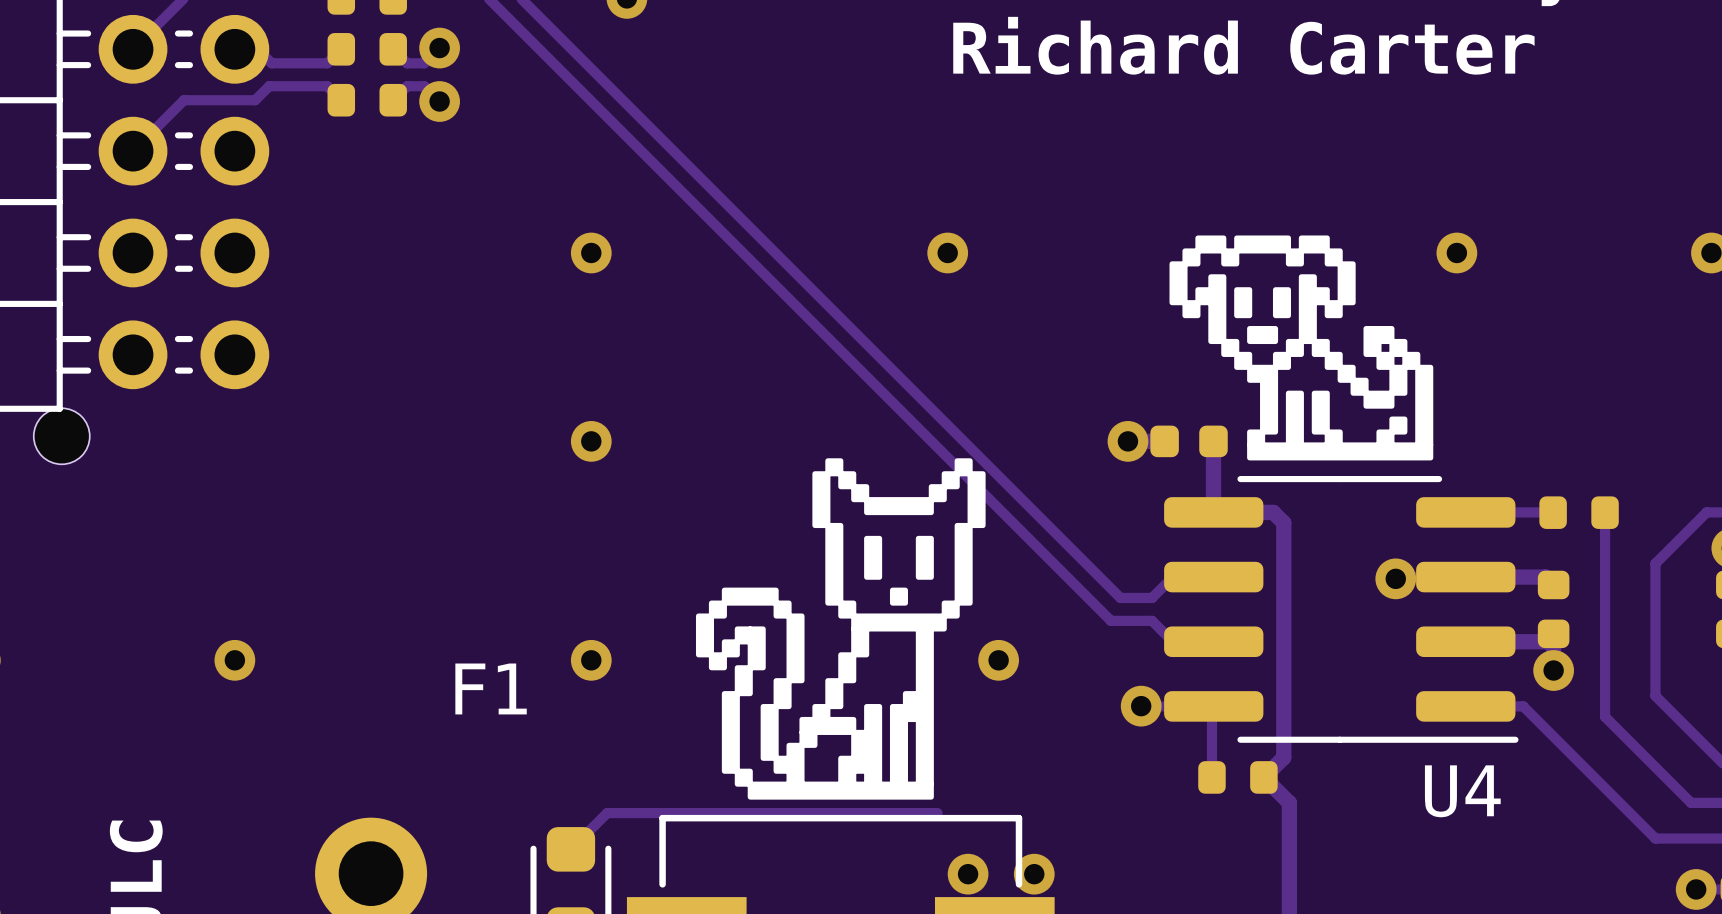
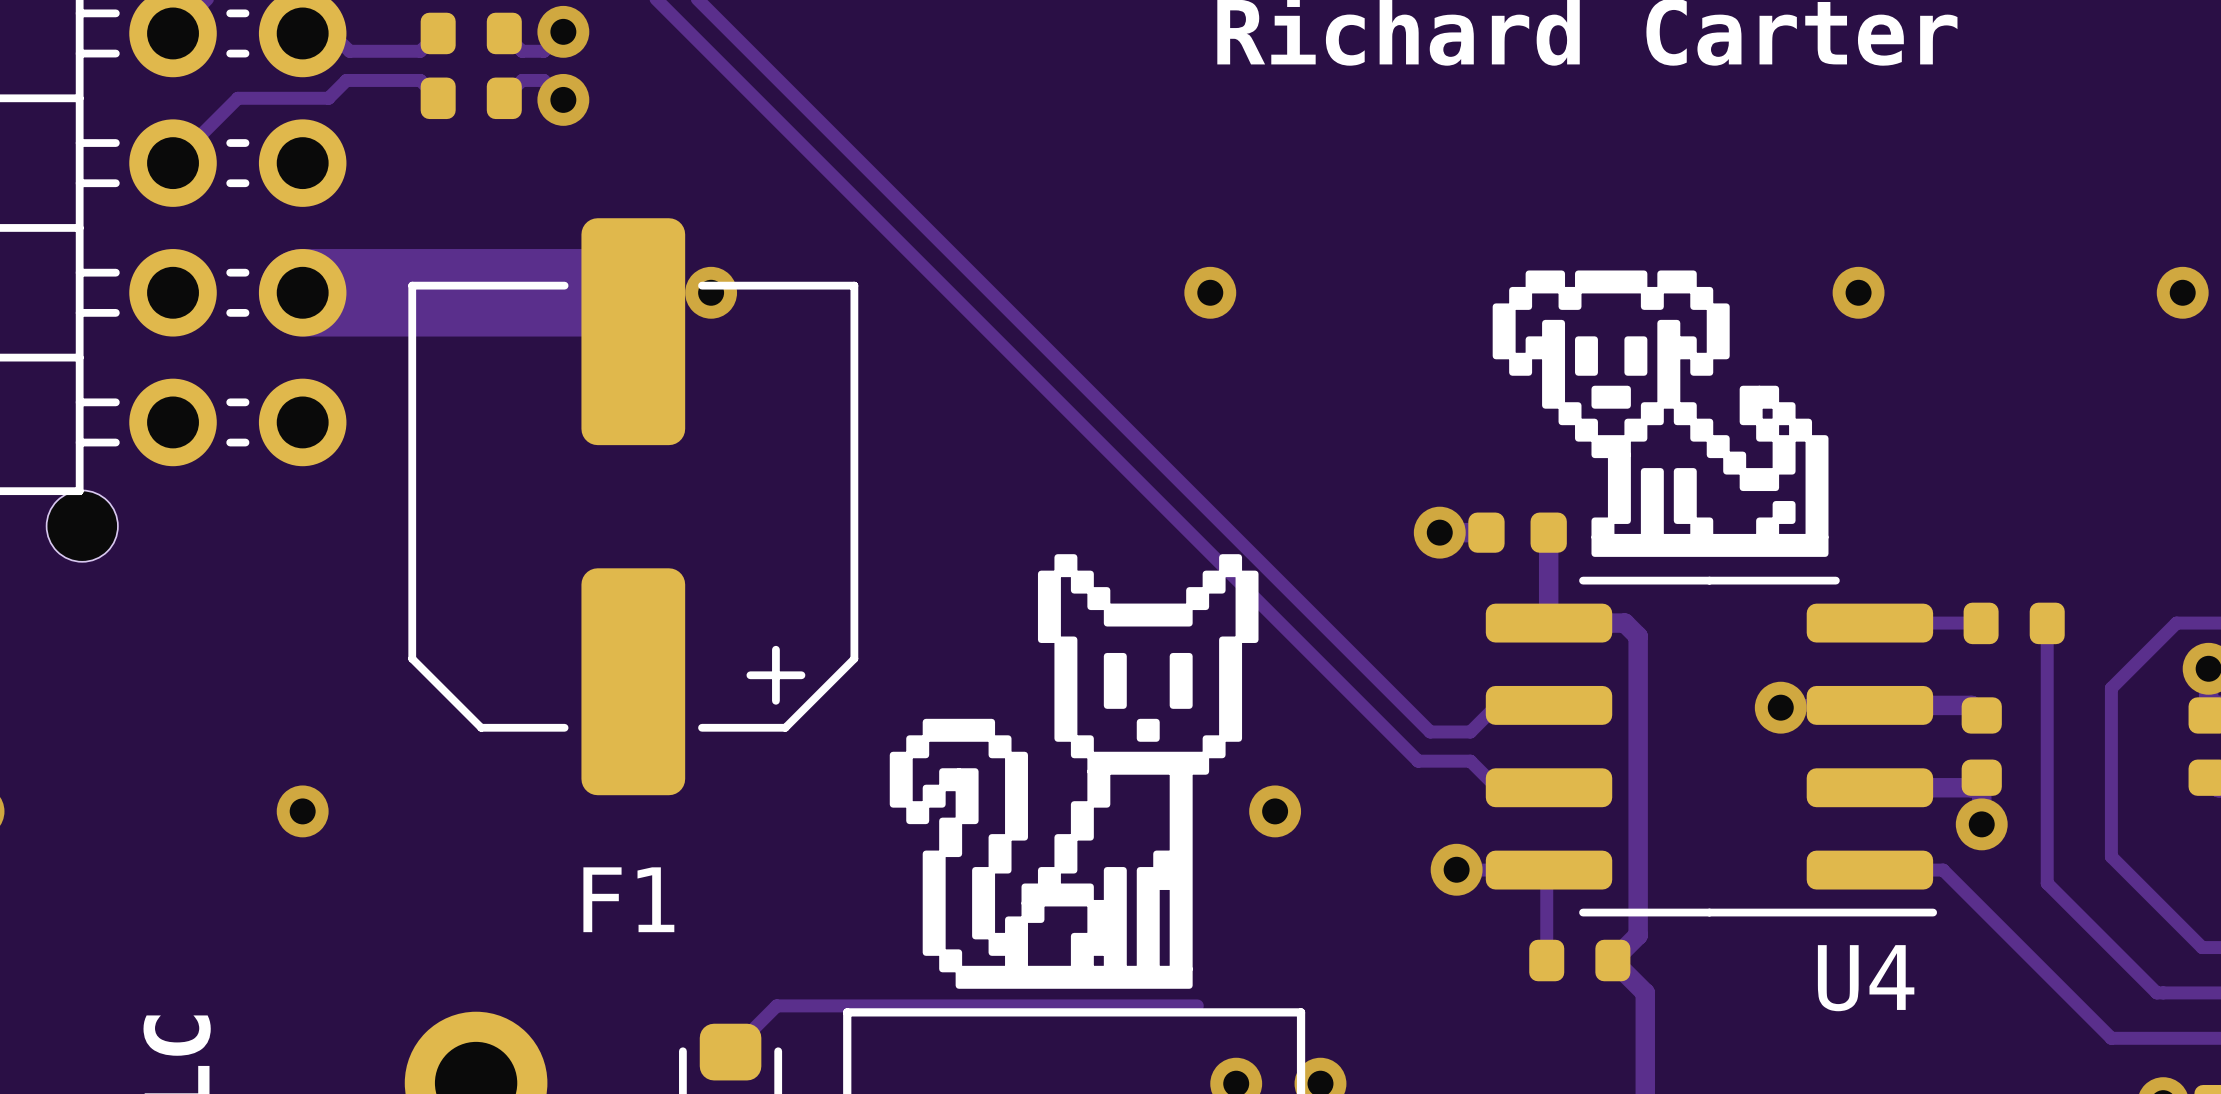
track: none -> (302, 292) (639, 292)
via position: (591, 252) -> (711, 292)
part: none -> (633, 506)
via: (591, 441) -> none
via: (591, 660) -> none
F1 name position: F1 (491, 688) -> F1 (628, 899)

